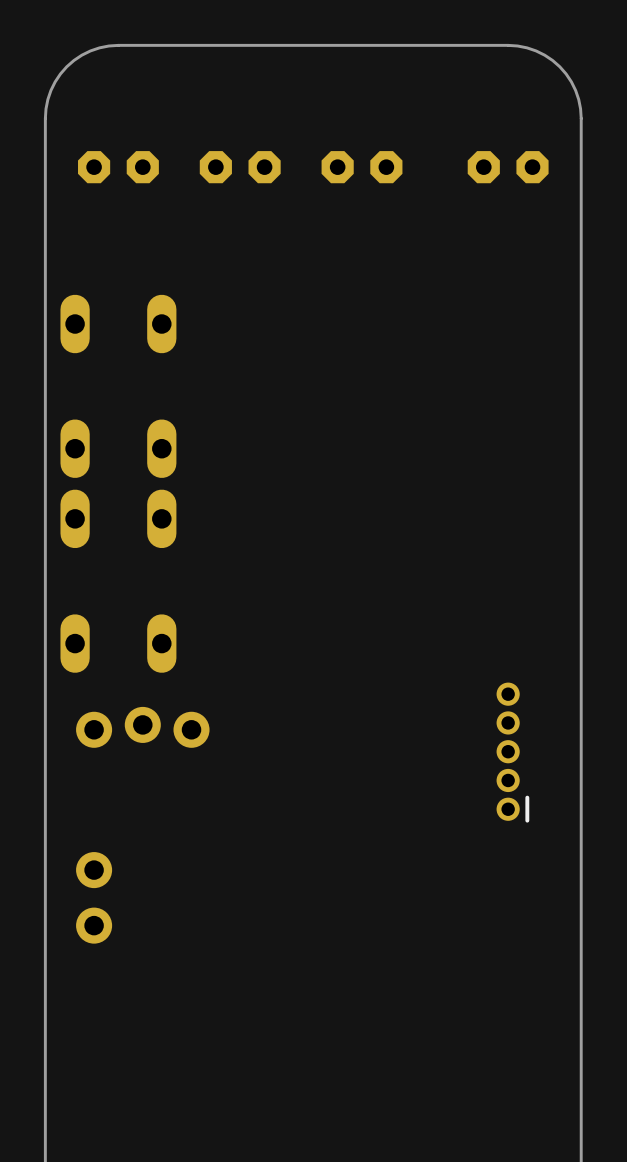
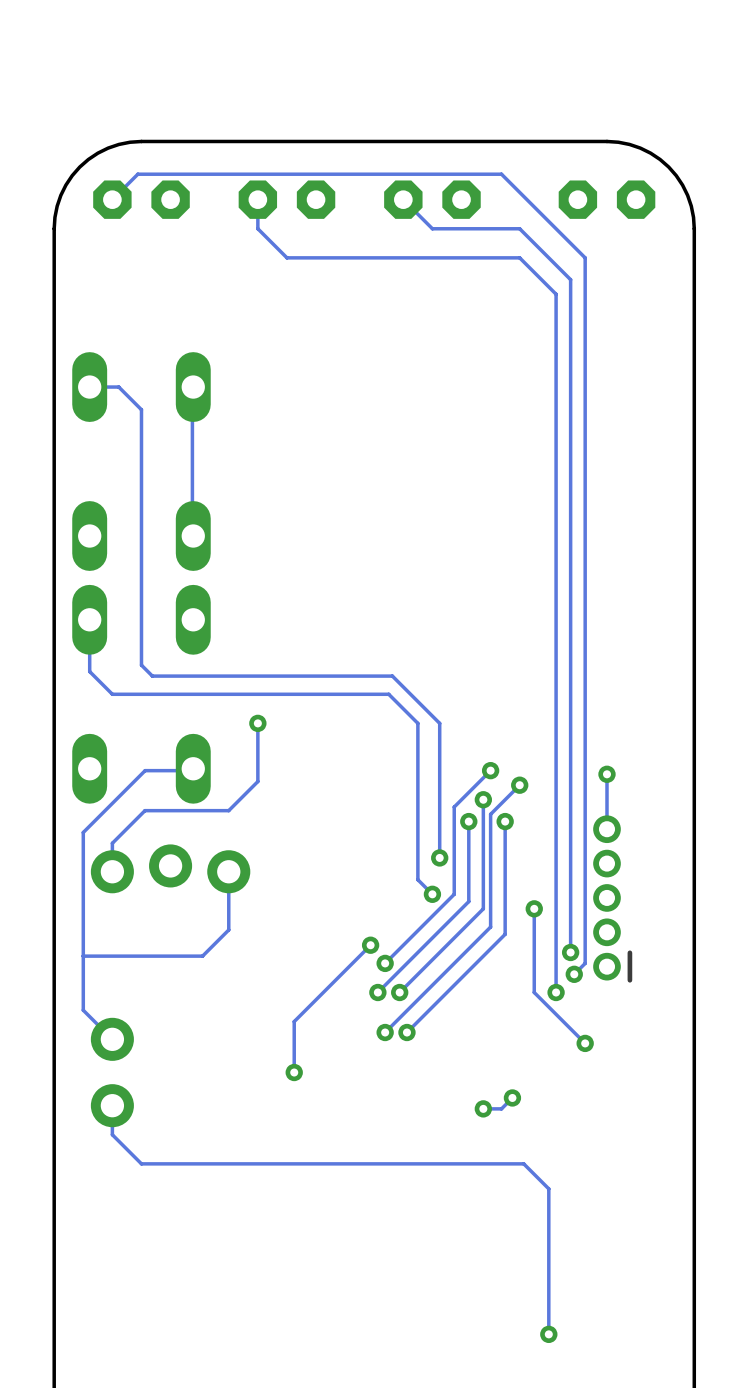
track: none -> (112, 199) (137, 174) (501, 174) (585, 257) (585, 963) (574, 974)
track: none -> (257, 199) (257, 228) (286, 257) (519, 257) (556, 294) (556, 992)
track: none -> (403, 199) (432, 228) (519, 228) (570, 279) (570, 952)
board edge: (581, 191) (580, 108) (571, 81) (559, 66) (544, 55) (527, 47) (508, 45) (118, 45) (99, 47) (81, 55) (66, 66) (50, 90) (45, 118) (45, 191) -> (694, 228) (687, 195) (668, 167) (640, 148) (607, 141) (130, 142) (97, 153) (79, 167) (60, 195) (54, 228)
track: none -> (89, 387) (118, 387) (141, 409) (141, 665) (152, 676) (392, 676) (439, 723) (439, 857)
track: none -> (193, 387) (193, 536)
track: none -> (89, 619) (89, 671) (112, 694) (388, 694) (417, 723) (417, 879) (432, 894)
track: none -> (257, 723) (257, 781) (228, 810) (144, 810) (112, 843) (112, 871)
via: none -> (257, 723)
track: none -> (193, 768) (192, 770) (145, 770) (83, 832) (83, 1010) (112, 1039)
track: none -> (490, 770) (454, 807) (454, 894) (385, 963)
via: none -> (490, 770)
track: none -> (607, 774) (607, 829)
via: none -> (607, 774)
track: none -> (519, 785) (490, 814) (490, 927) (385, 1032)
via: none -> (519, 785)
track: none -> (483, 799) (483, 908) (399, 992)
via: none -> (483, 799)
track: none -> (468, 821) (468, 901) (377, 992)
via: none -> (468, 821)
track: none -> (505, 821) (505, 934) (406, 1032)
via: none -> (505, 821)
via: none -> (439, 857)
track: none -> (228, 871) (228, 929) (202, 956) (83, 956)
via: none -> (432, 894)
track: none -> (534, 908) (534, 992) (585, 1043)
via: none -> (534, 908)
track: none -> (370, 945) (294, 1021) (294, 1072)
via: none -> (370, 945)
via: none -> (570, 952)
via: none -> (385, 963)
via: none -> (574, 974)
via: none -> (377, 992)
via: none -> (399, 992)
via: none -> (556, 992)
via: none -> (385, 1032)
via: none -> (406, 1032)
via: none -> (585, 1043)
via: none -> (294, 1072)
track: none -> (512, 1097) (501, 1108) (483, 1108)
via: none -> (512, 1097)
track: none -> (112, 1105) (112, 1134) (141, 1163) (523, 1163) (548, 1188) (548, 1334)
via: none -> (483, 1108)
via: none -> (548, 1334)

